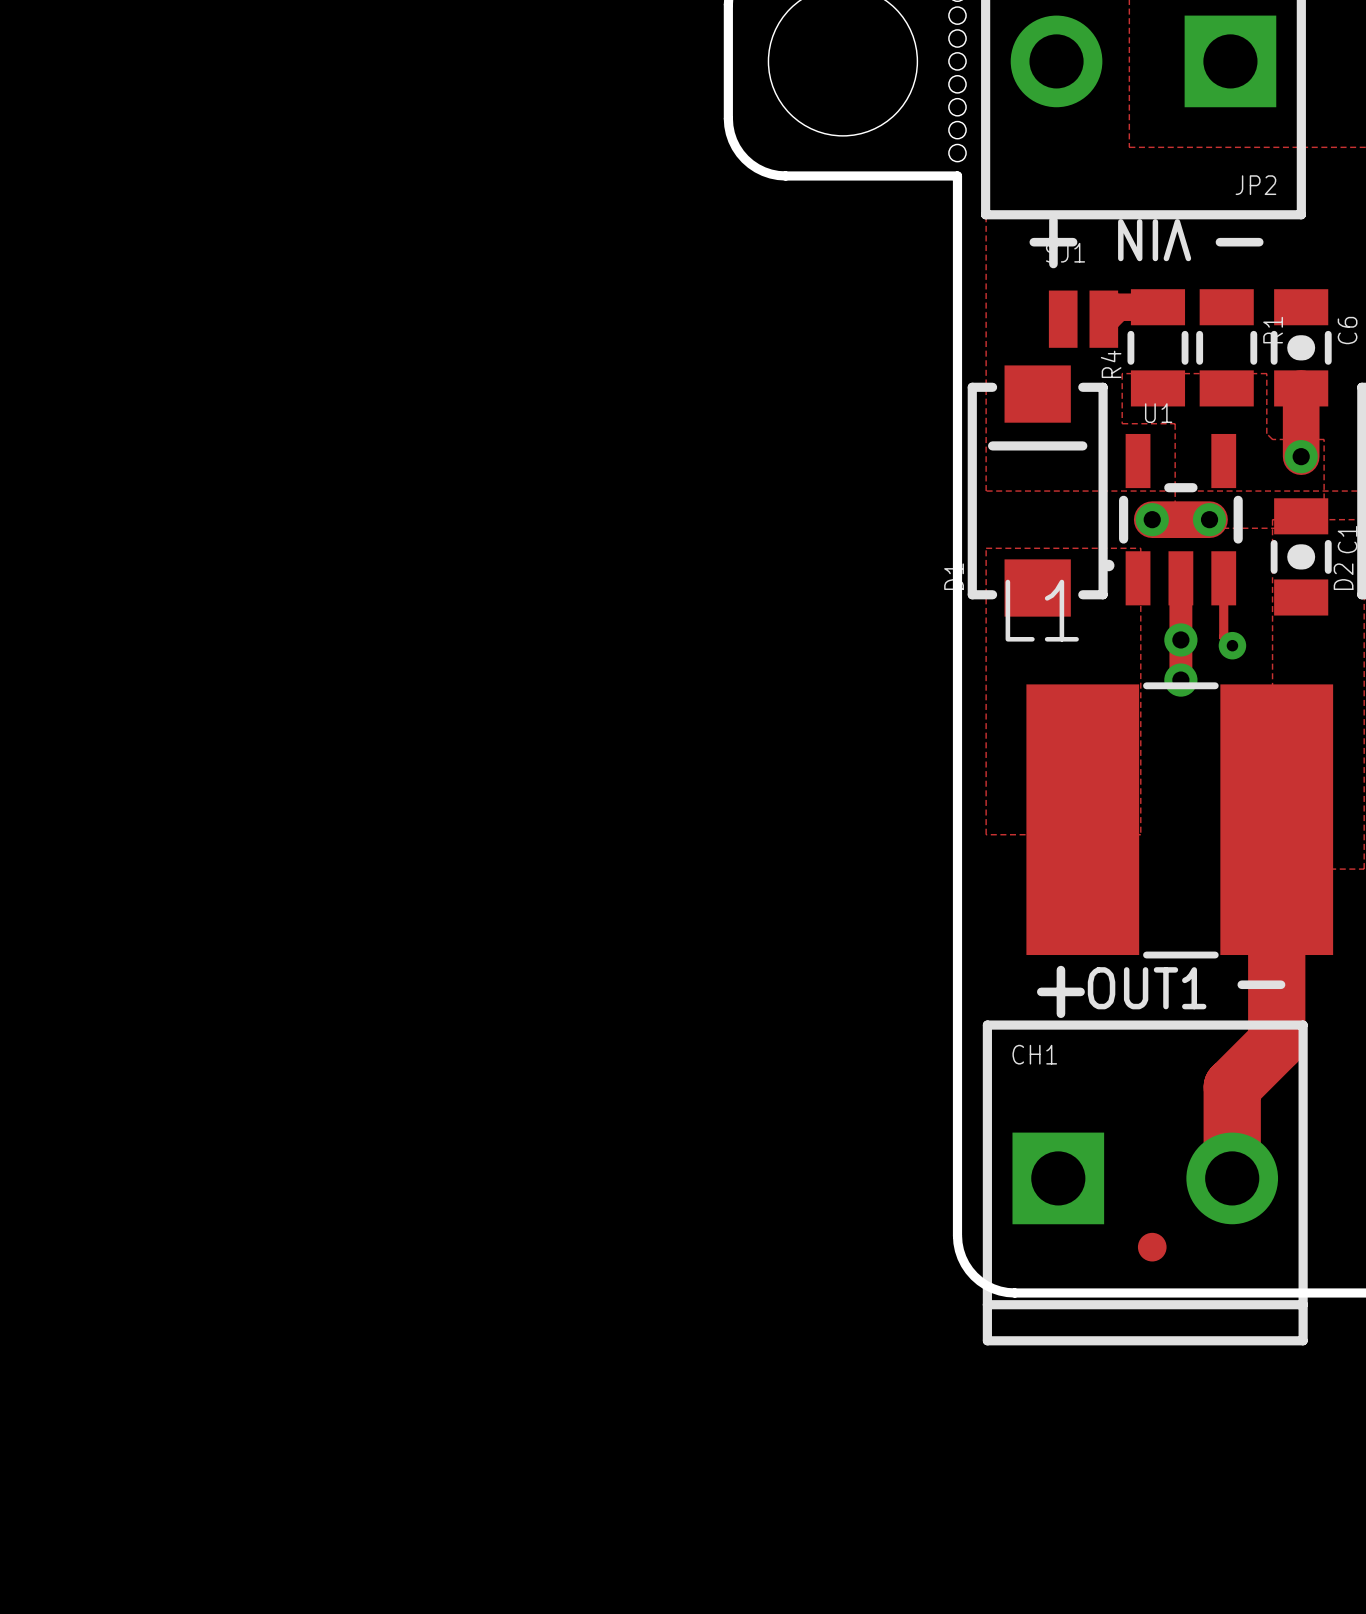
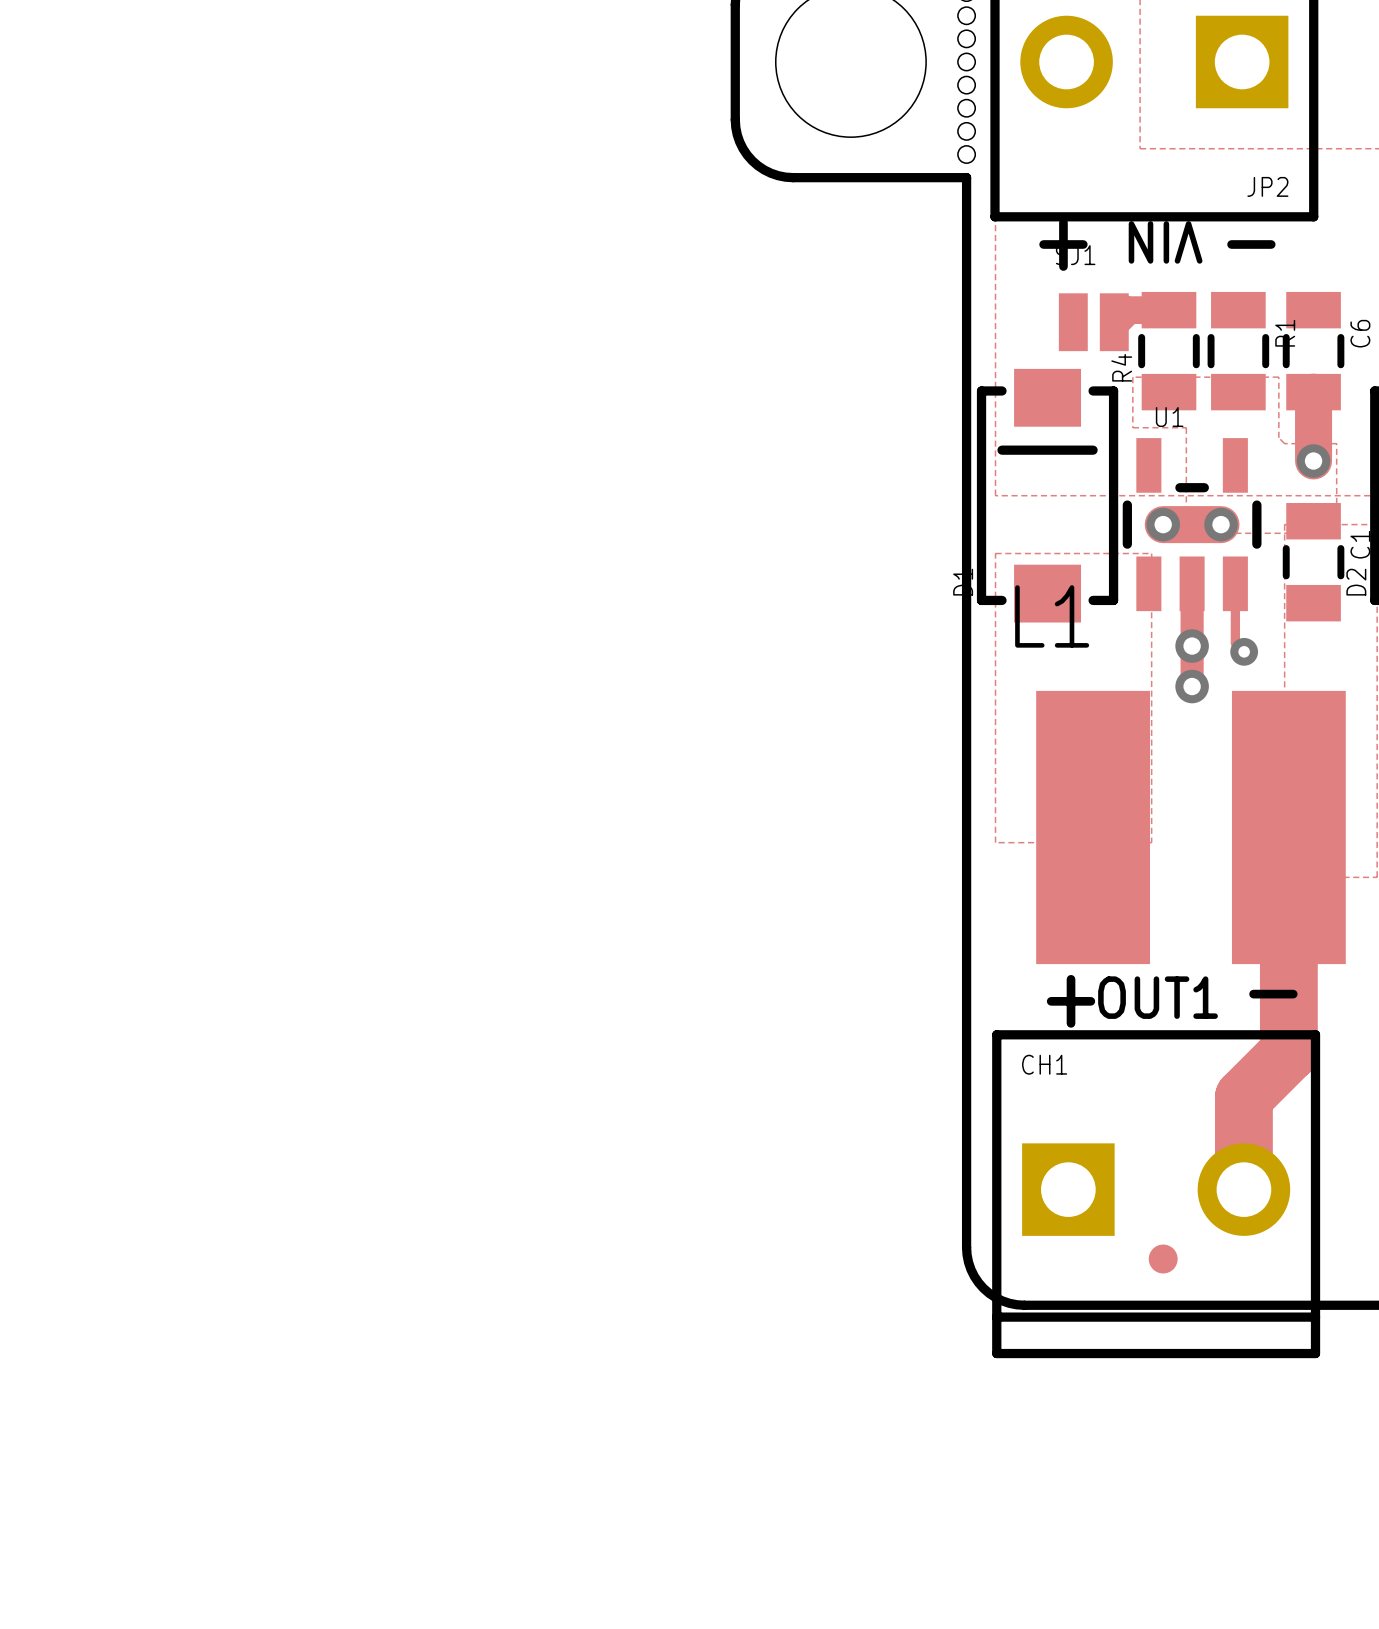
C6 footprint: [1270, 289, 1332, 407] -> [1282, 291, 1345, 411]
U1 footprint: [1102, 433, 1243, 606] -> [1122, 438, 1262, 612]
C1 footprint: [1270, 498, 1332, 616] -> [1282, 503, 1345, 622]
L1 footprint: [1026, 682, 1334, 959] -> [1036, 690, 1346, 965]

